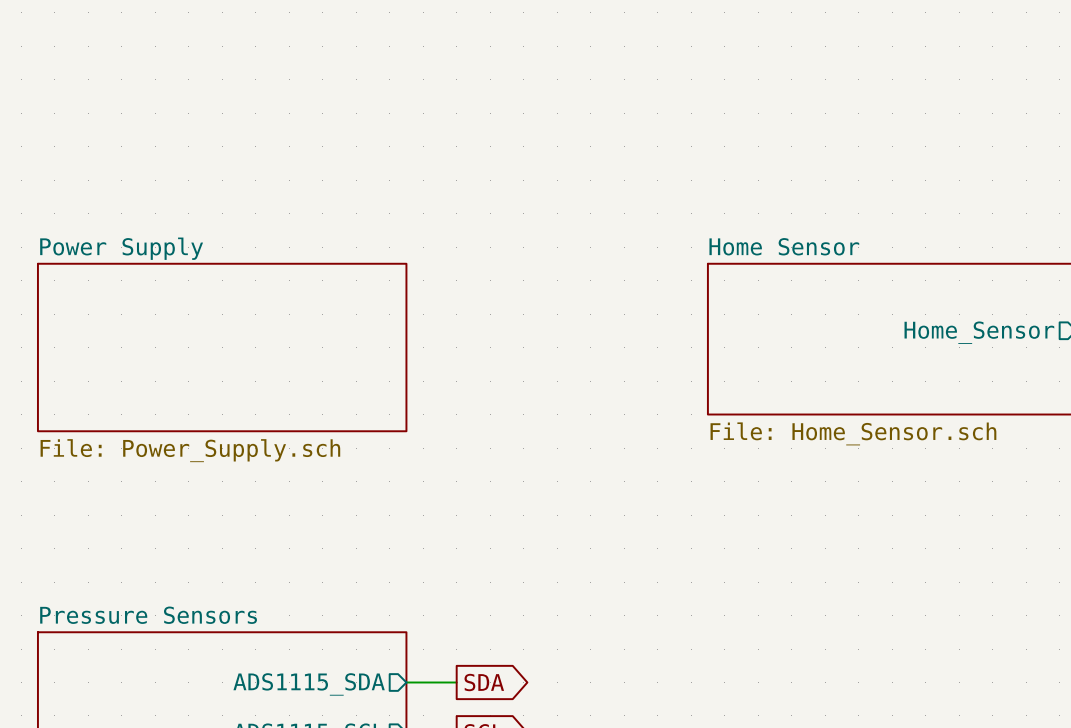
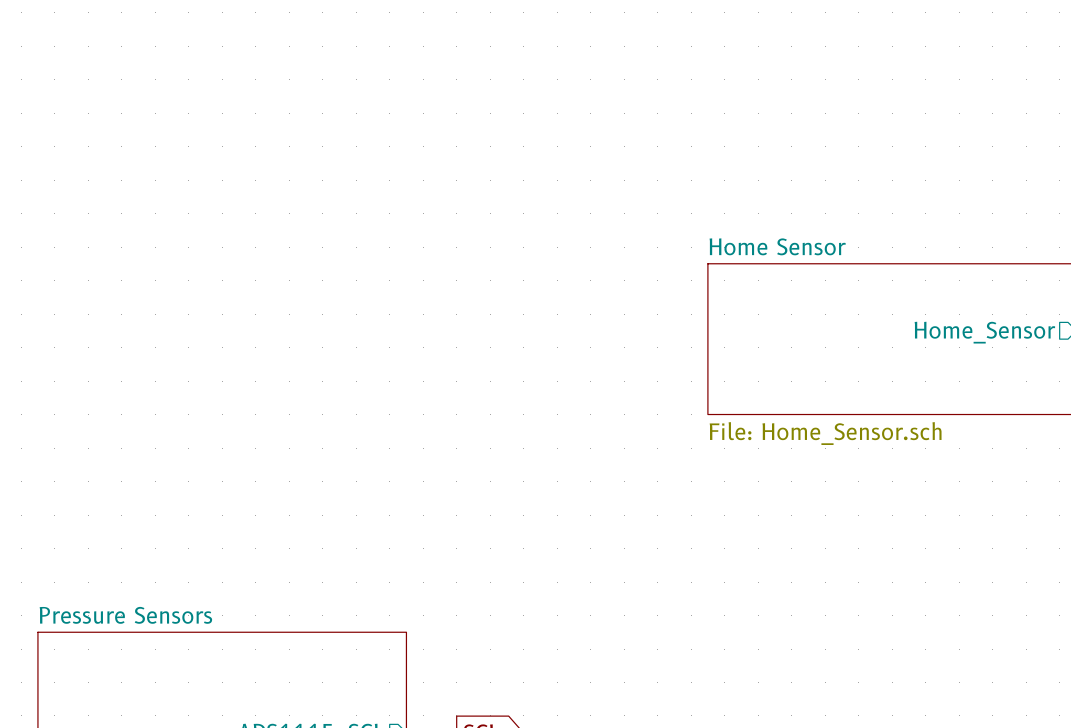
sheet Power Supply: File: Power_Supply.sch (222, 347) -> none
wire: (406, 682) (456, 682) -> none
global label: SDA (484, 682) -> none
sheet pin: ADS1115_SDA (309, 684) -> none

